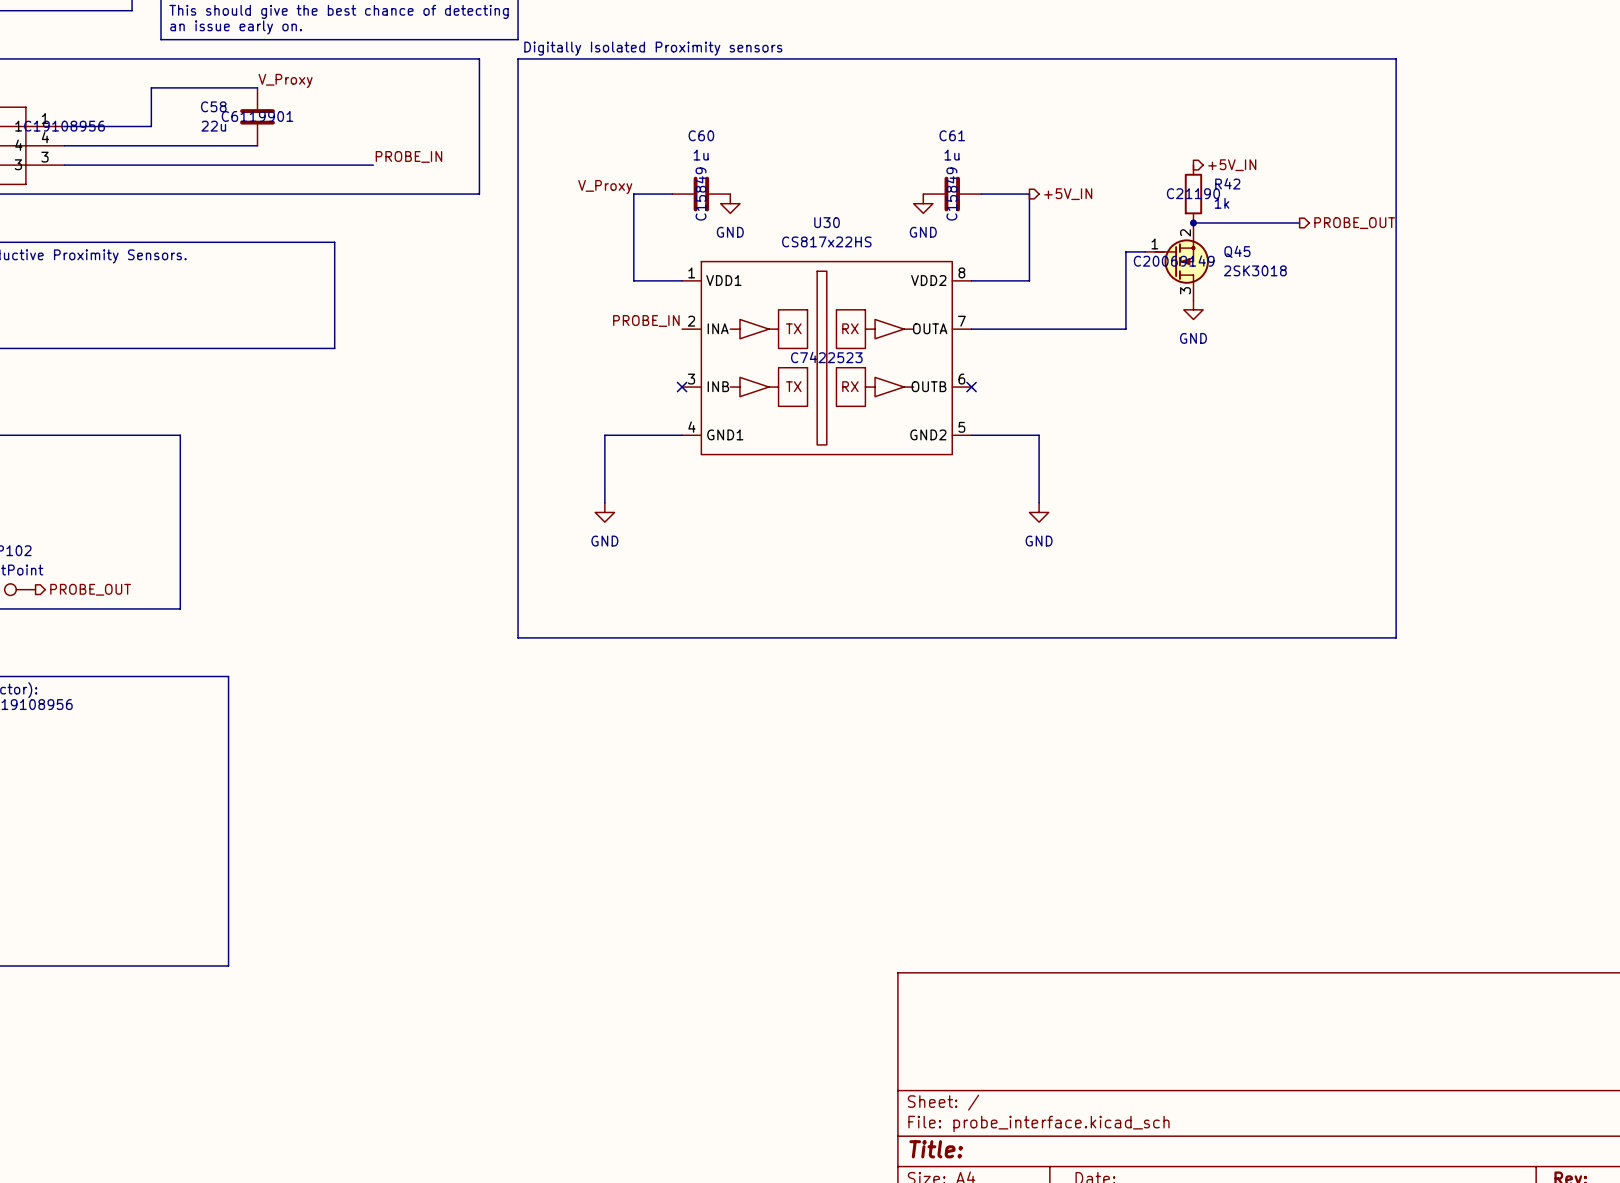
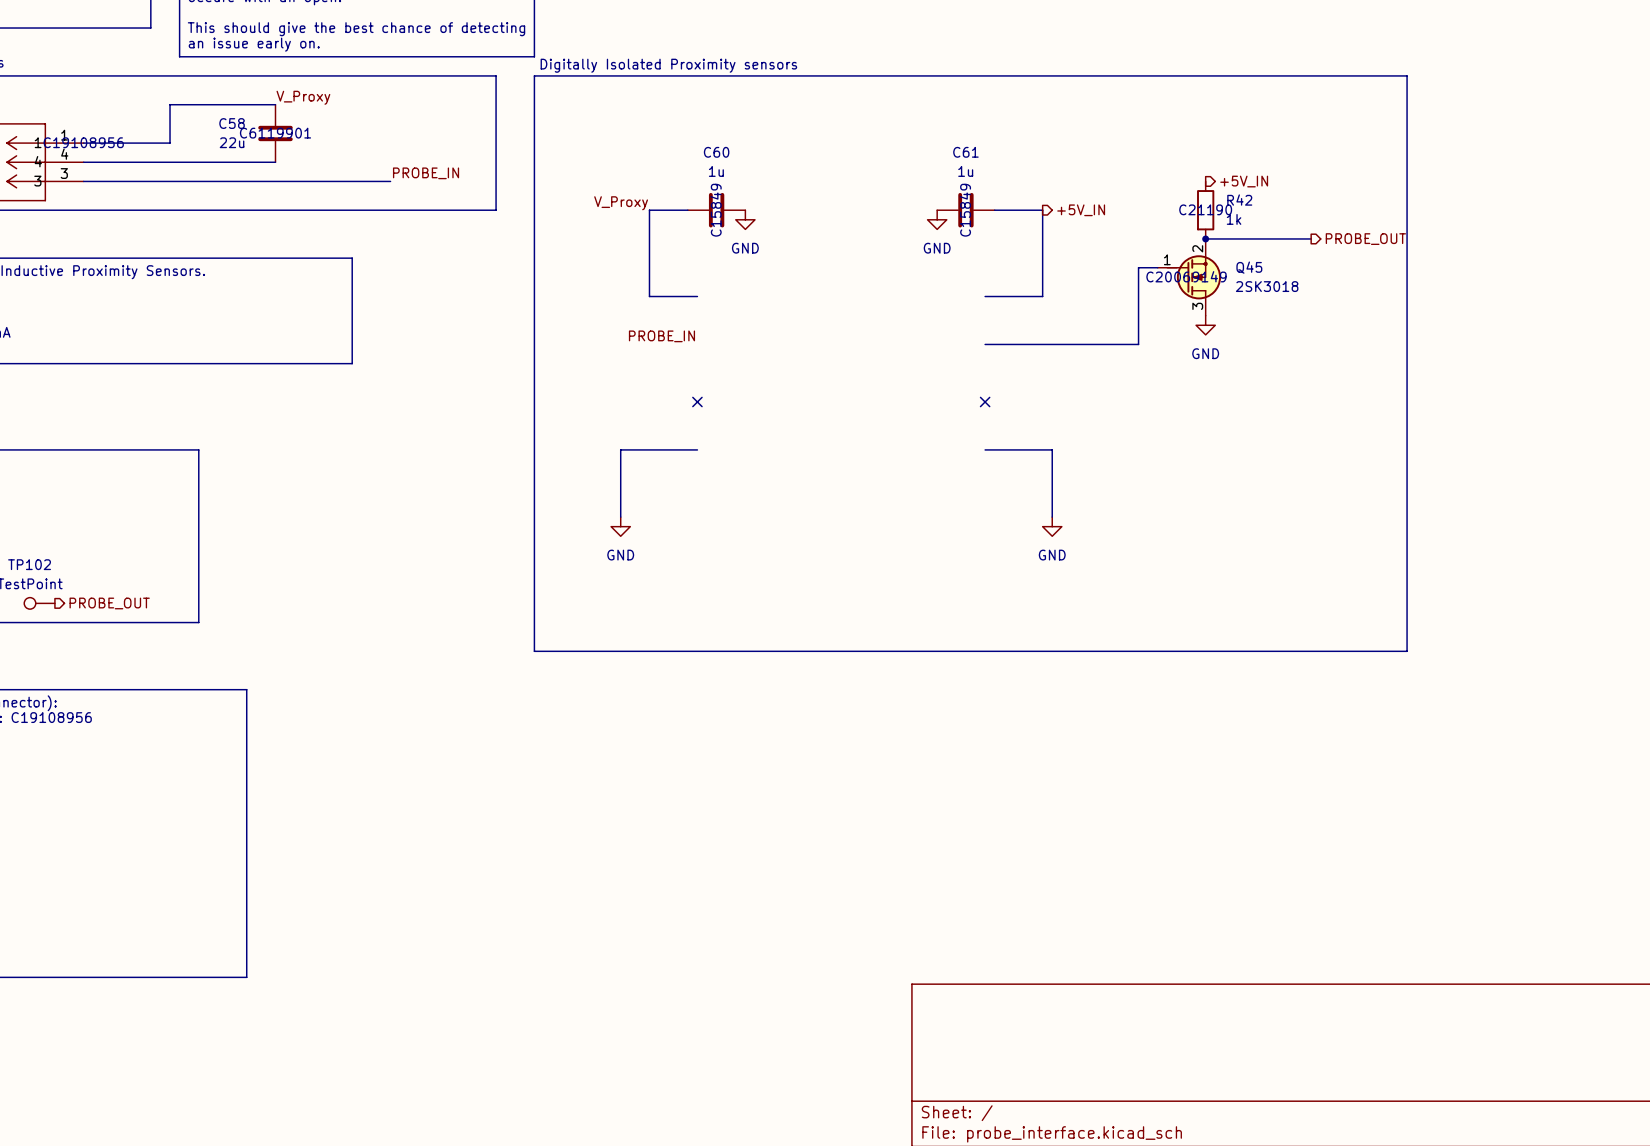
U30: CS817x22HS (826, 358) -> none

